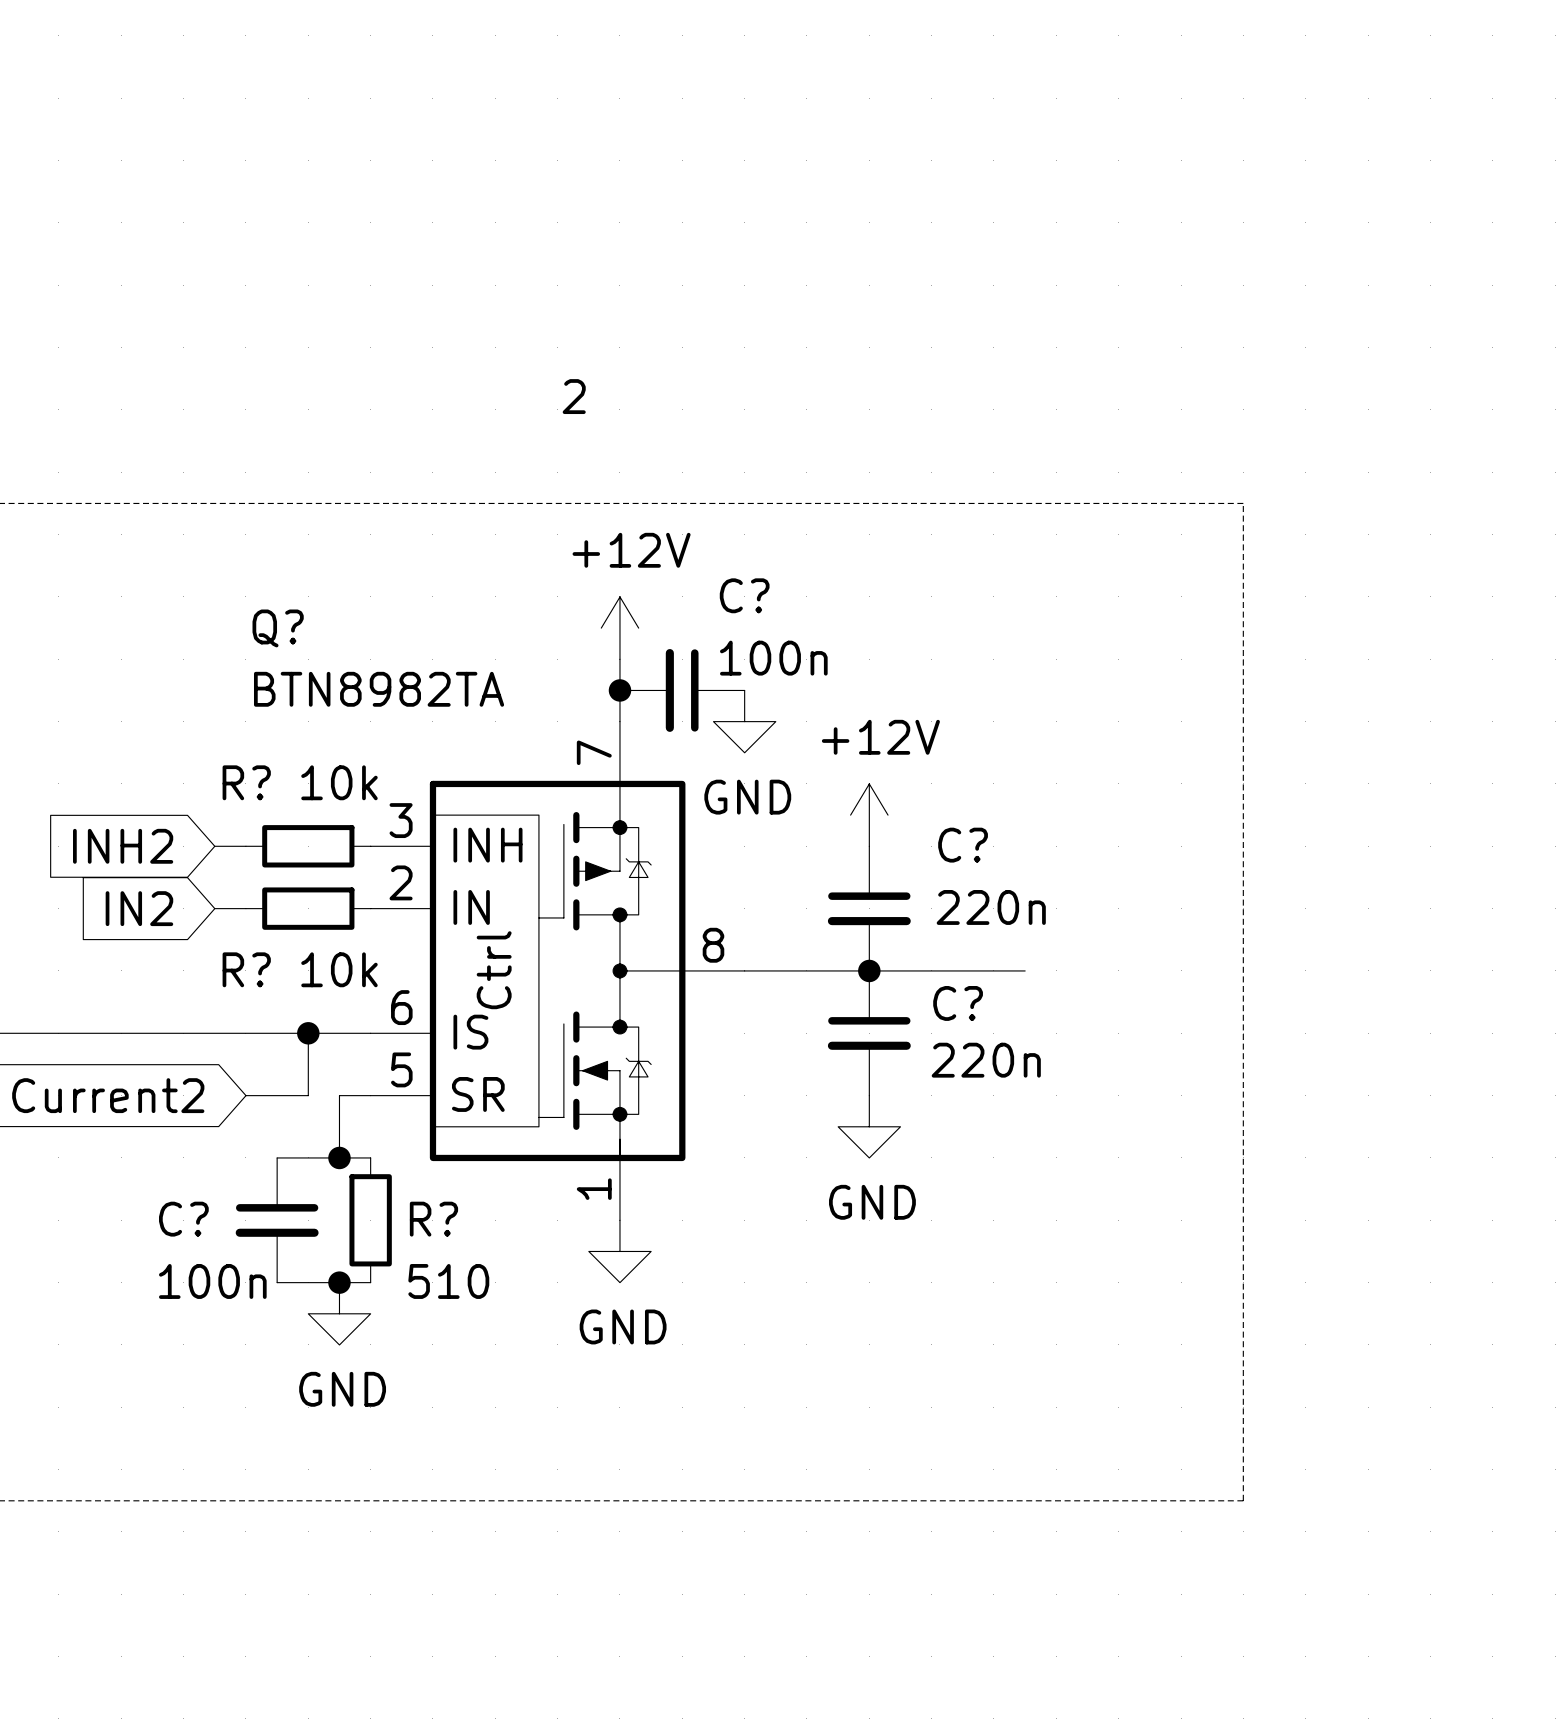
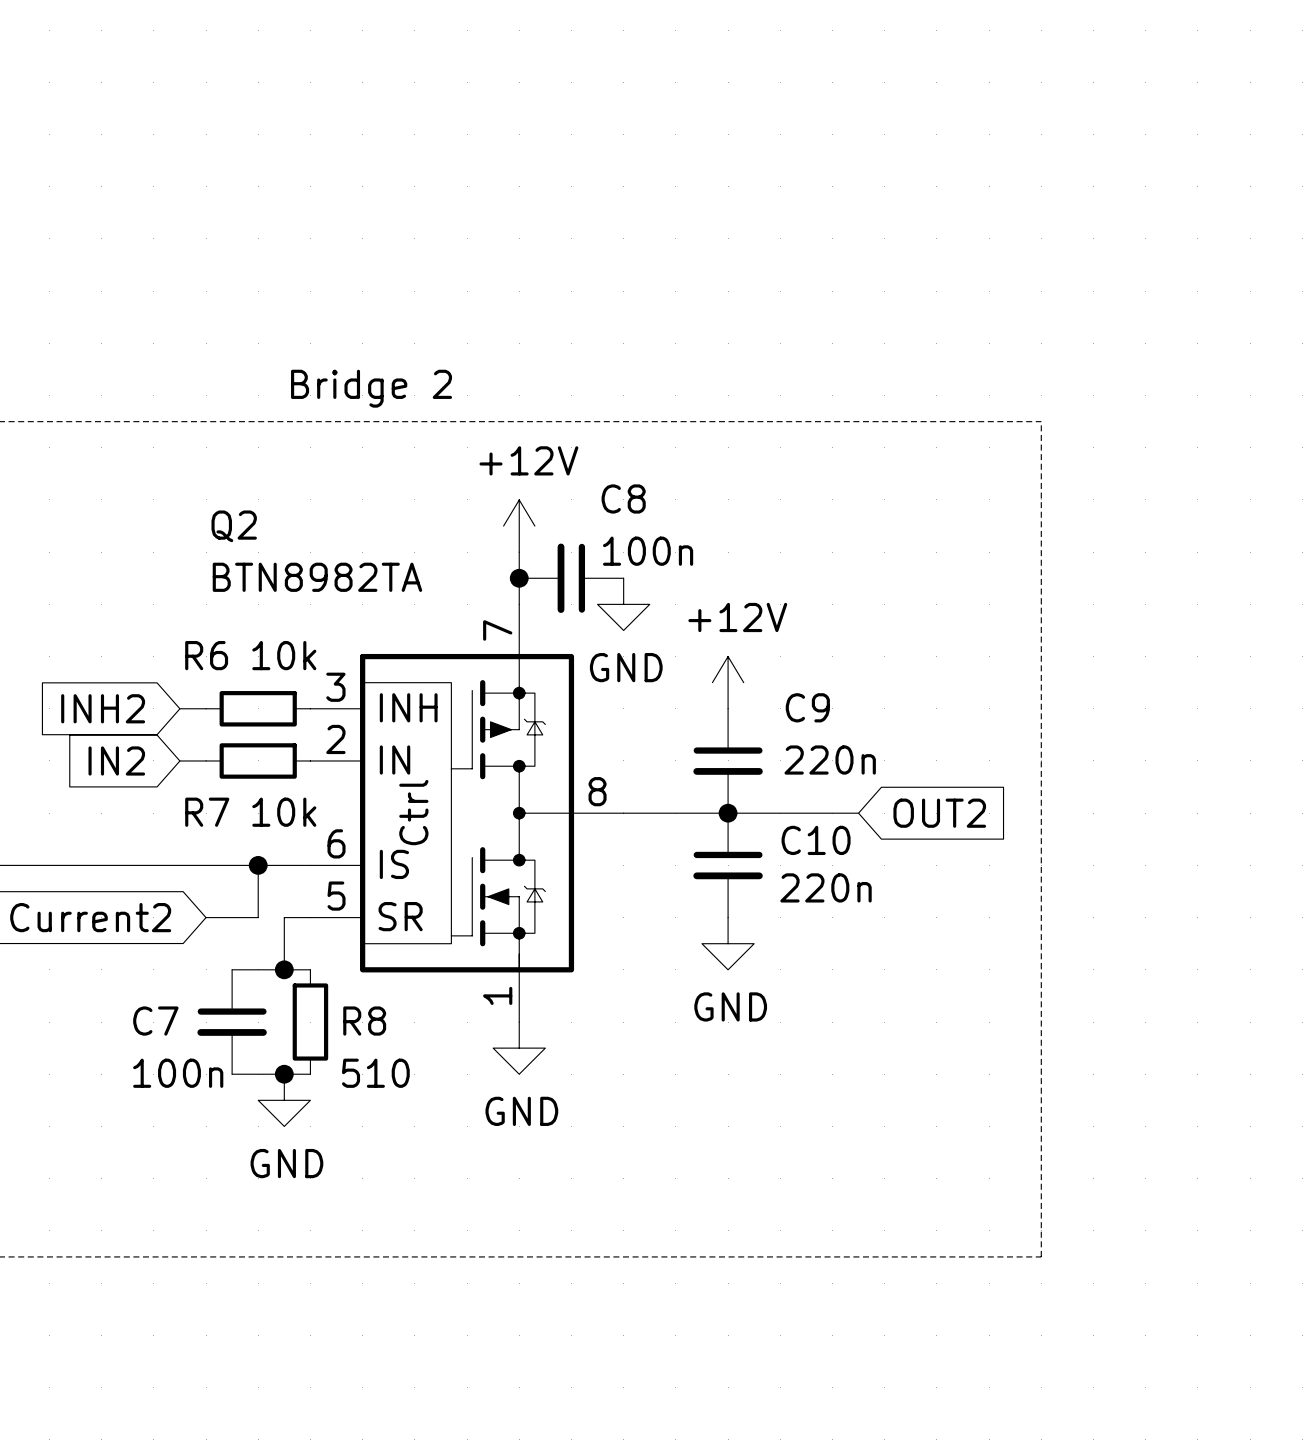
text: 2 (574, 396) -> none
text: none -> Bridge 2 (371, 388)
C? name: C? (744, 595) -> C8 (623, 498)
Q? name: Q? (278, 628) -> Q2 (234, 526)
R? name: R? (246, 782) -> R6 (206, 655)
C? name: C? (963, 845) -> C9 (807, 707)
R? name: R? (246, 969) -> R7 (207, 812)
global label: none -> OUT2 (939, 813)
C? name: C? (958, 1003) -> C10 (816, 840)
C? name: C? (183, 1219) -> C7 (155, 1021)
R? name: R? (433, 1219) -> R8 (364, 1021)

